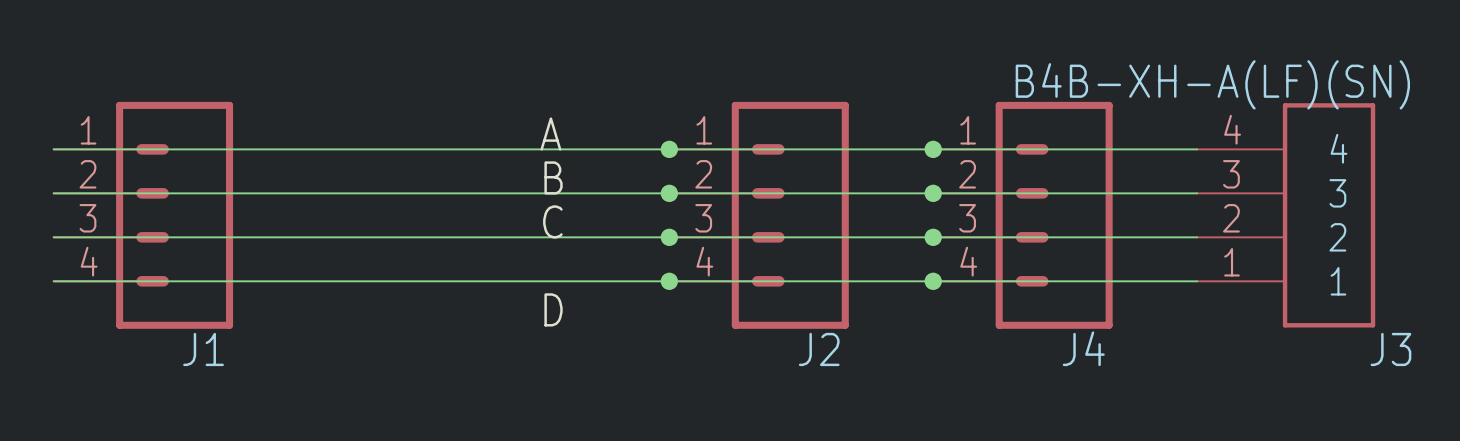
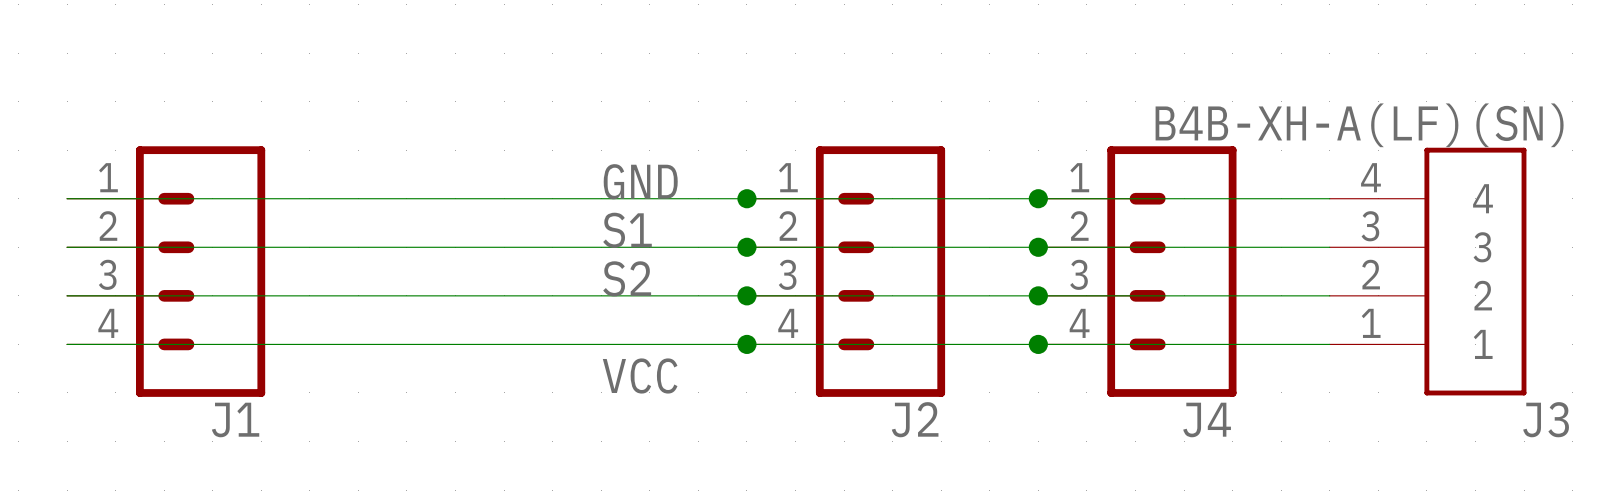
label: A (550, 133) -> GND (640, 181)
label: B (553, 177) -> S1 (627, 230)
label: C (552, 221) -> S2 (627, 278)
label: D (553, 309) -> VCC (640, 375)

